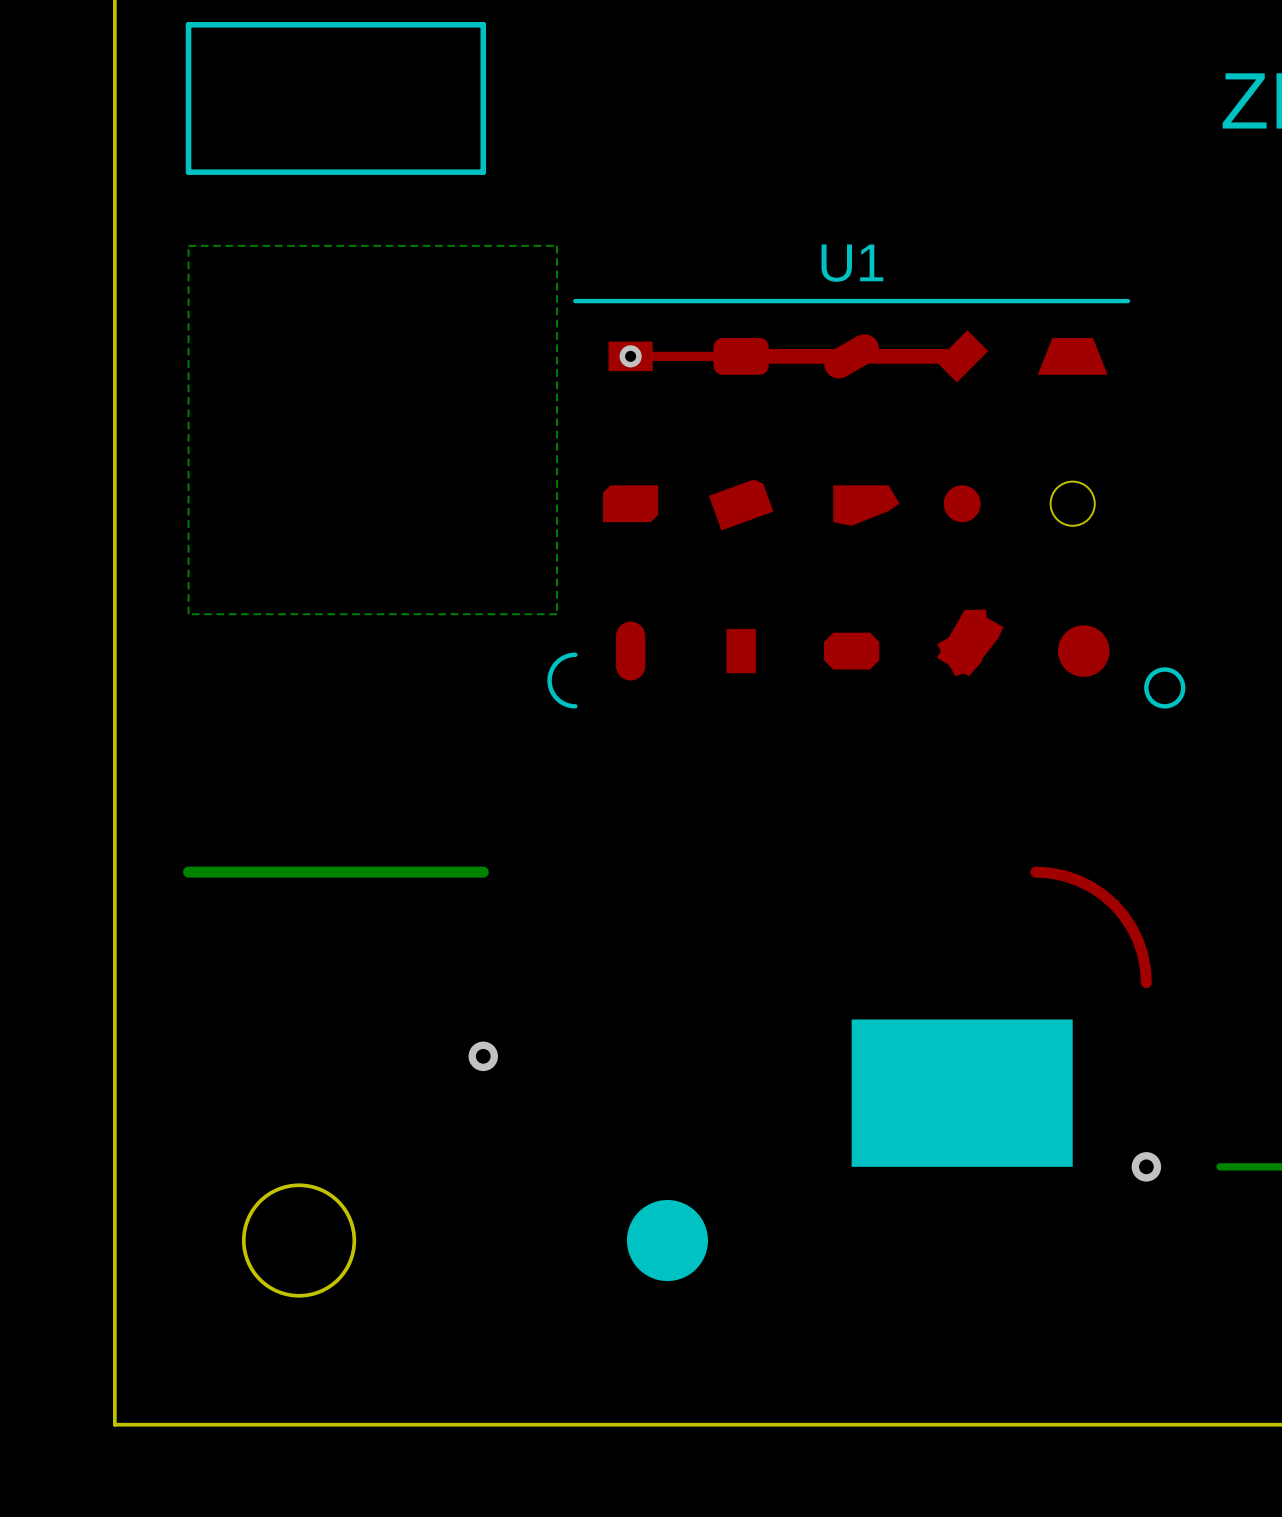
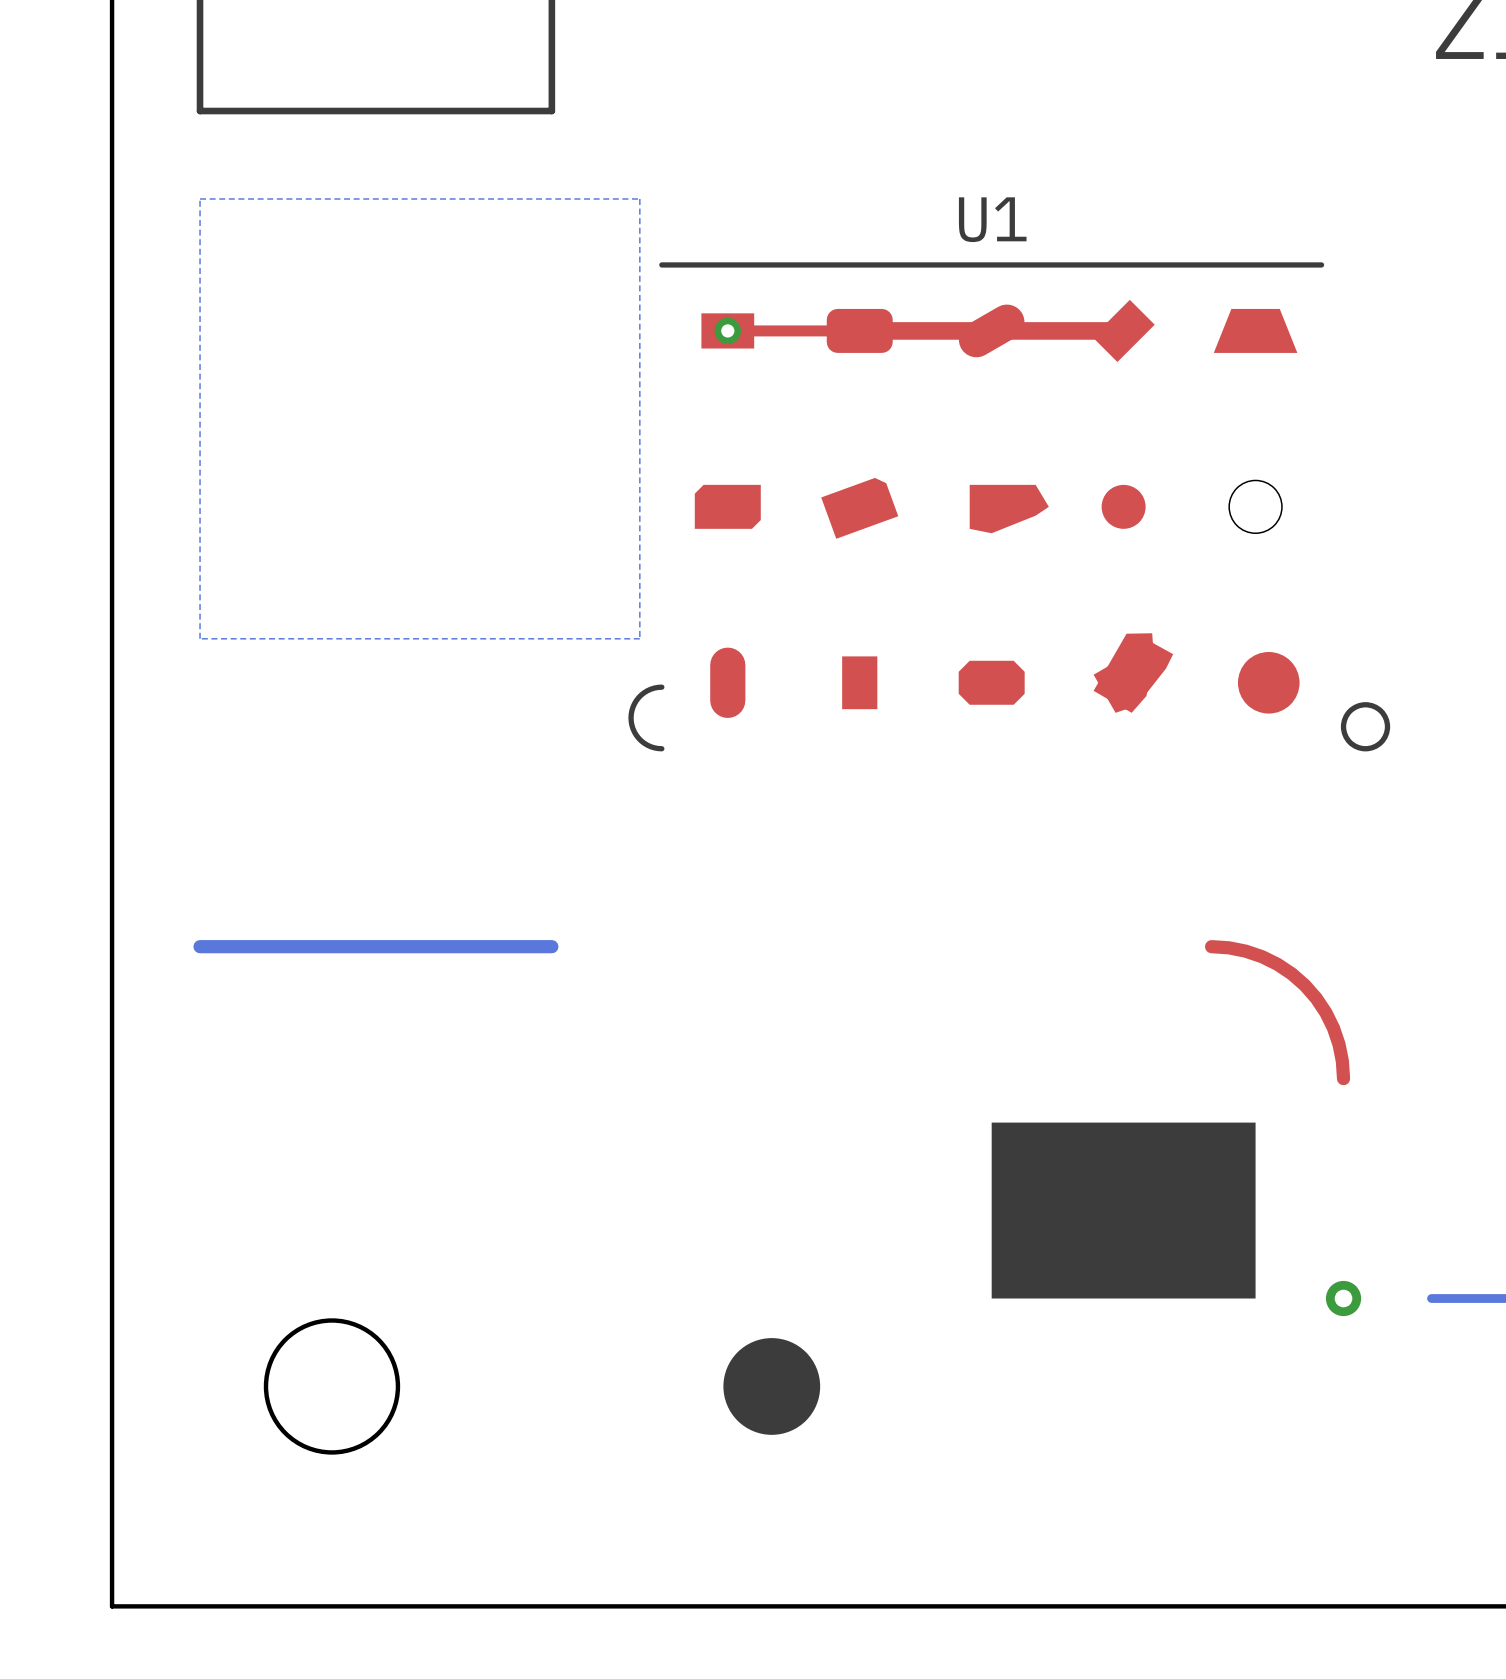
via: (483, 1056) -> none

